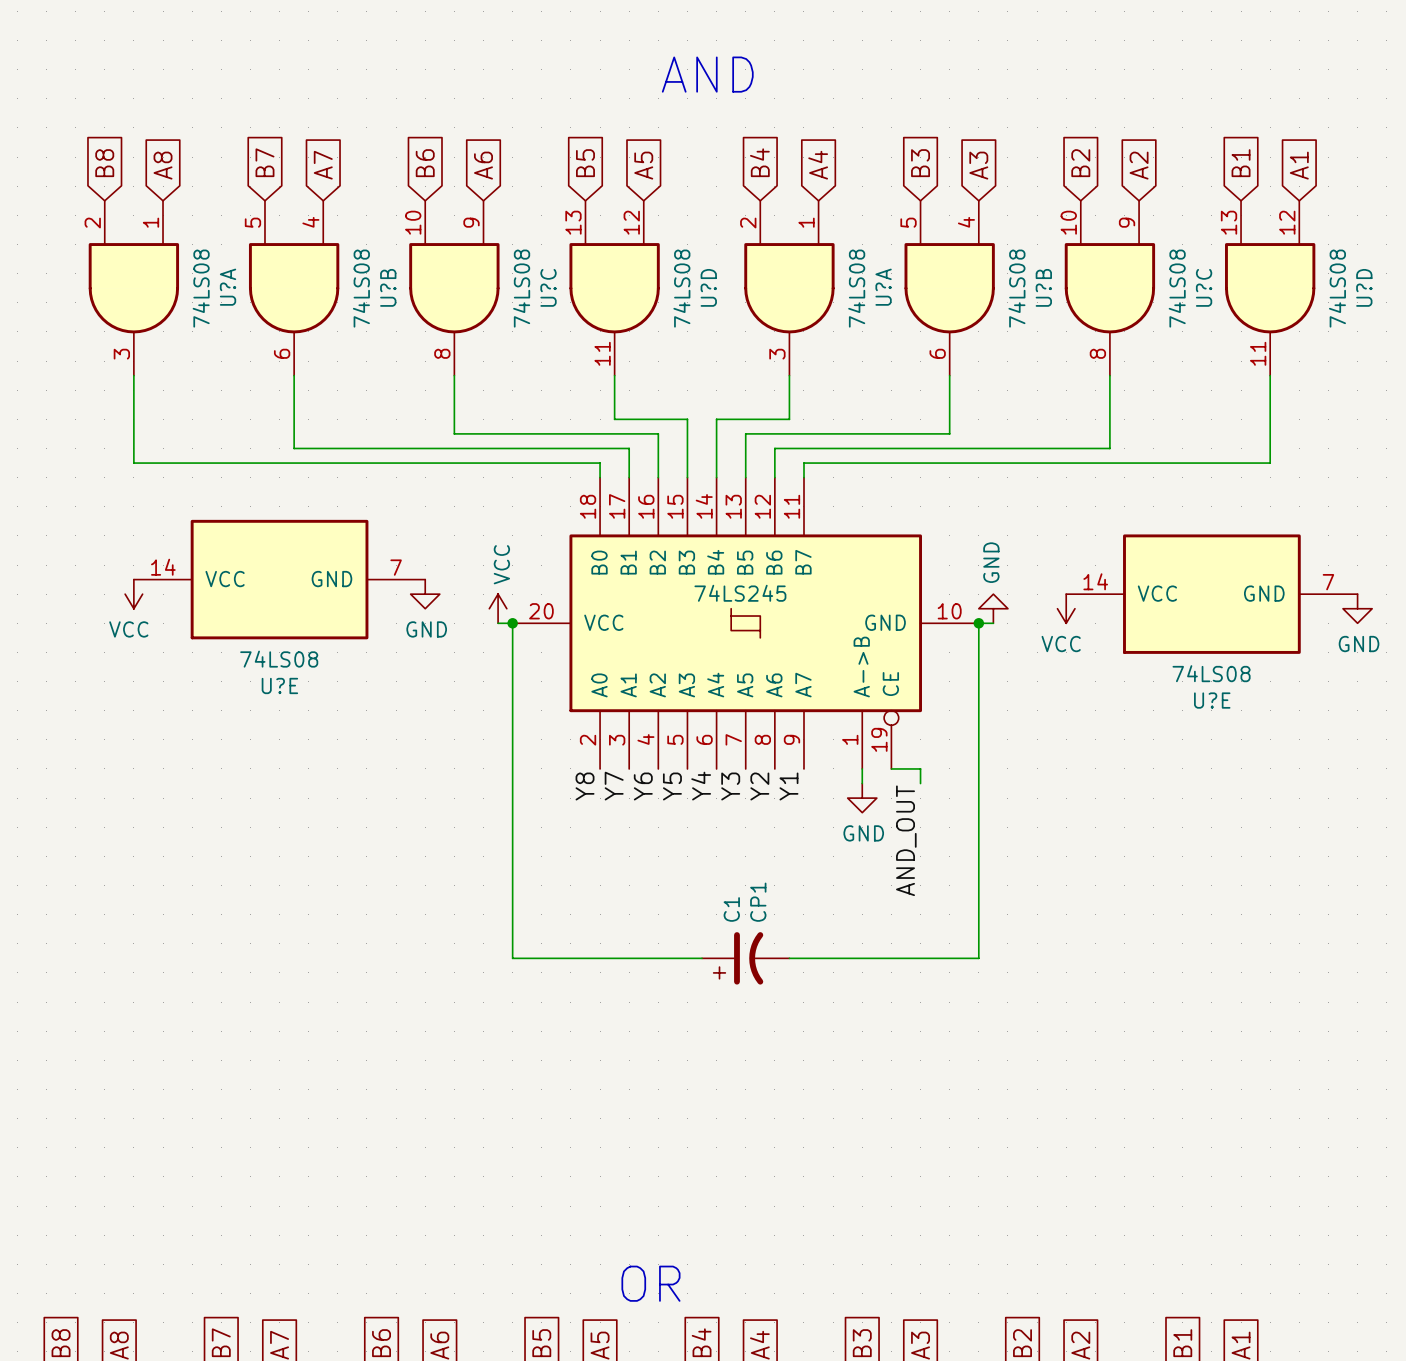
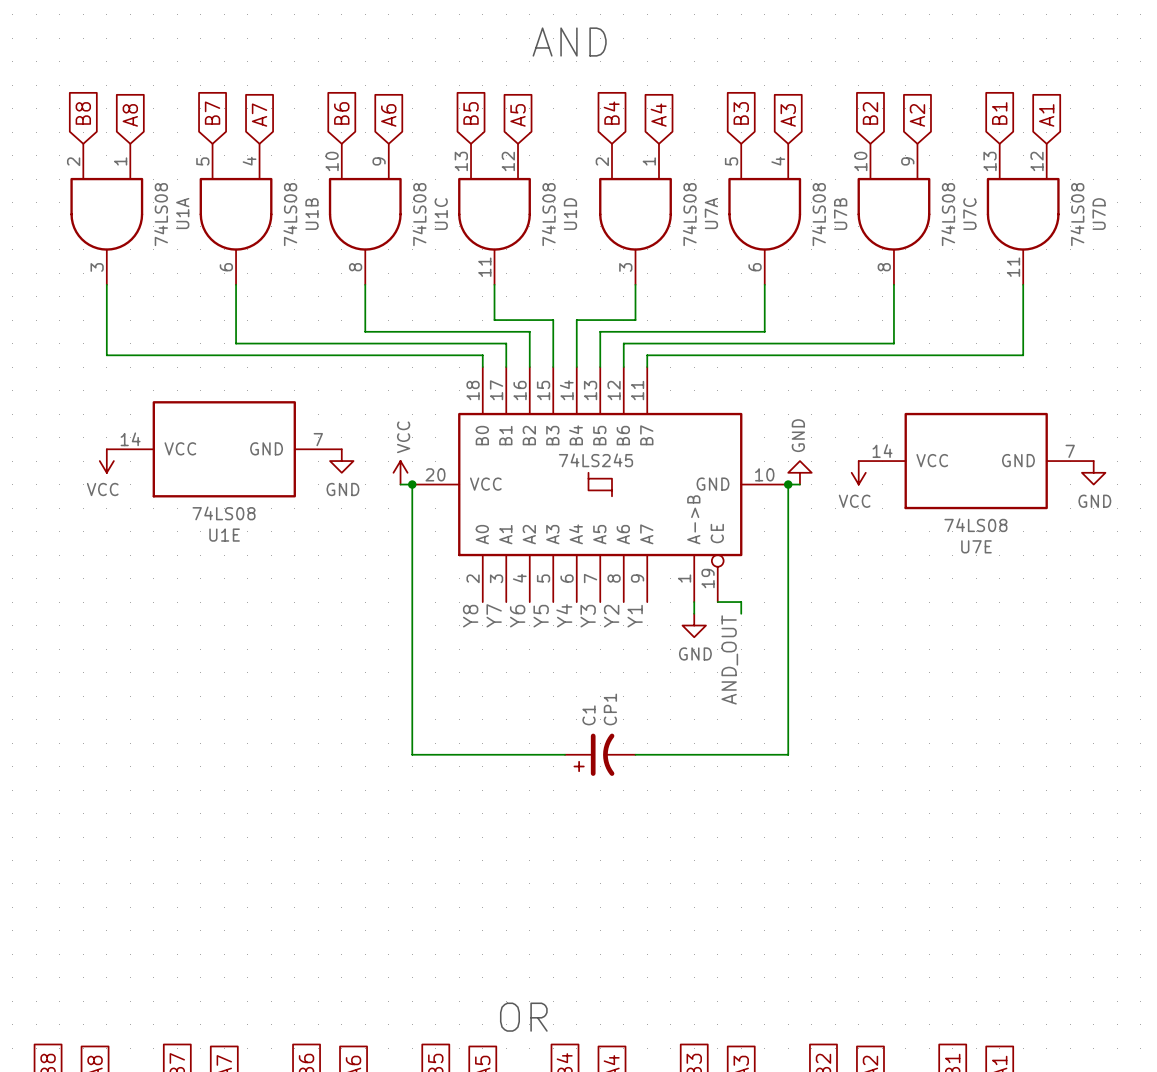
U?A name: U?A (228, 287) -> U1A (182, 213)
U?B name: U?B (388, 287) -> U1B (311, 214)
U?C name: U?C (548, 287) -> U1C (441, 214)
U?D name: U?D (708, 287) -> U1D (570, 214)
U?A name: U?A (883, 287) -> U7A (711, 213)
U?B name: U?B (1043, 287) -> U7B (840, 214)
U?C name: U?C (1204, 287) -> U7C (969, 214)
U?D name: U?D (1364, 287) -> U7D (1099, 214)
U?E name: U?E (279, 685) -> U1E (224, 535)
U?E name: U?E (1212, 700) -> U7E (976, 546)

